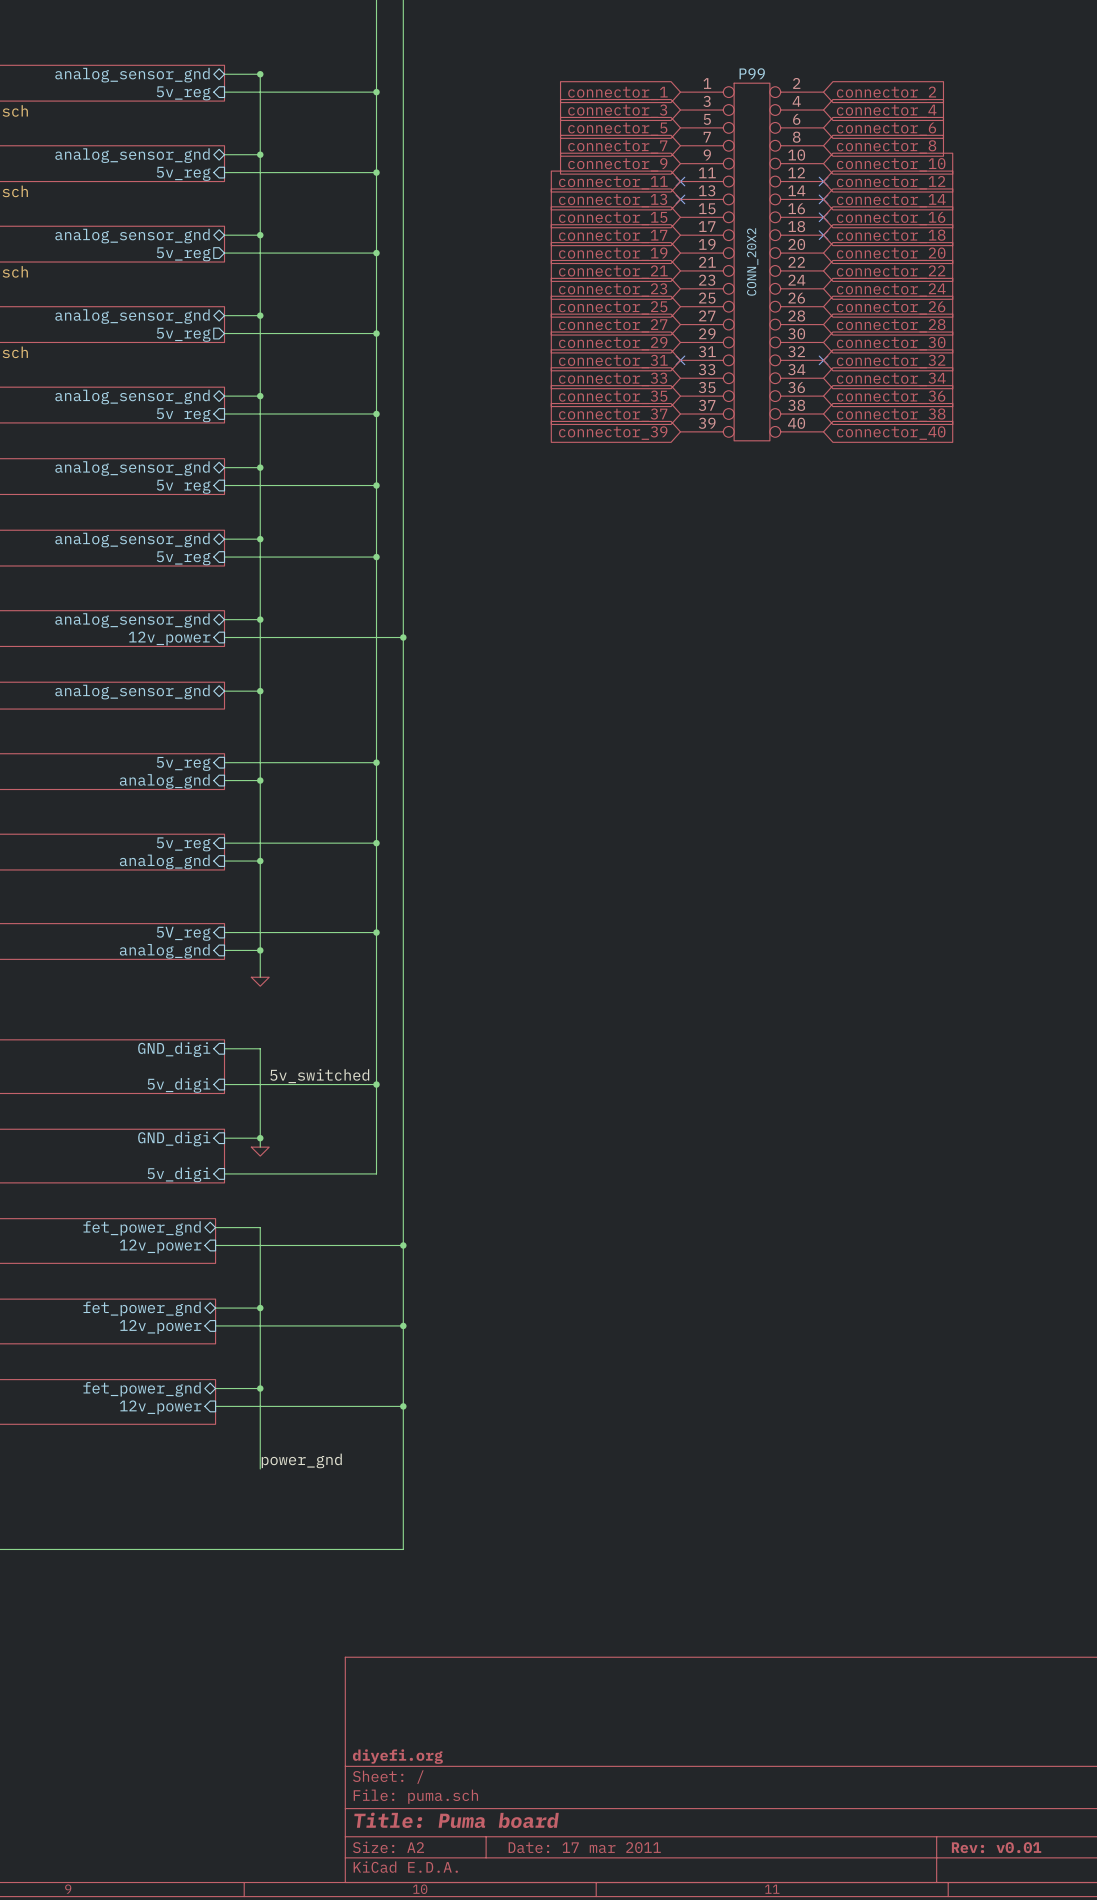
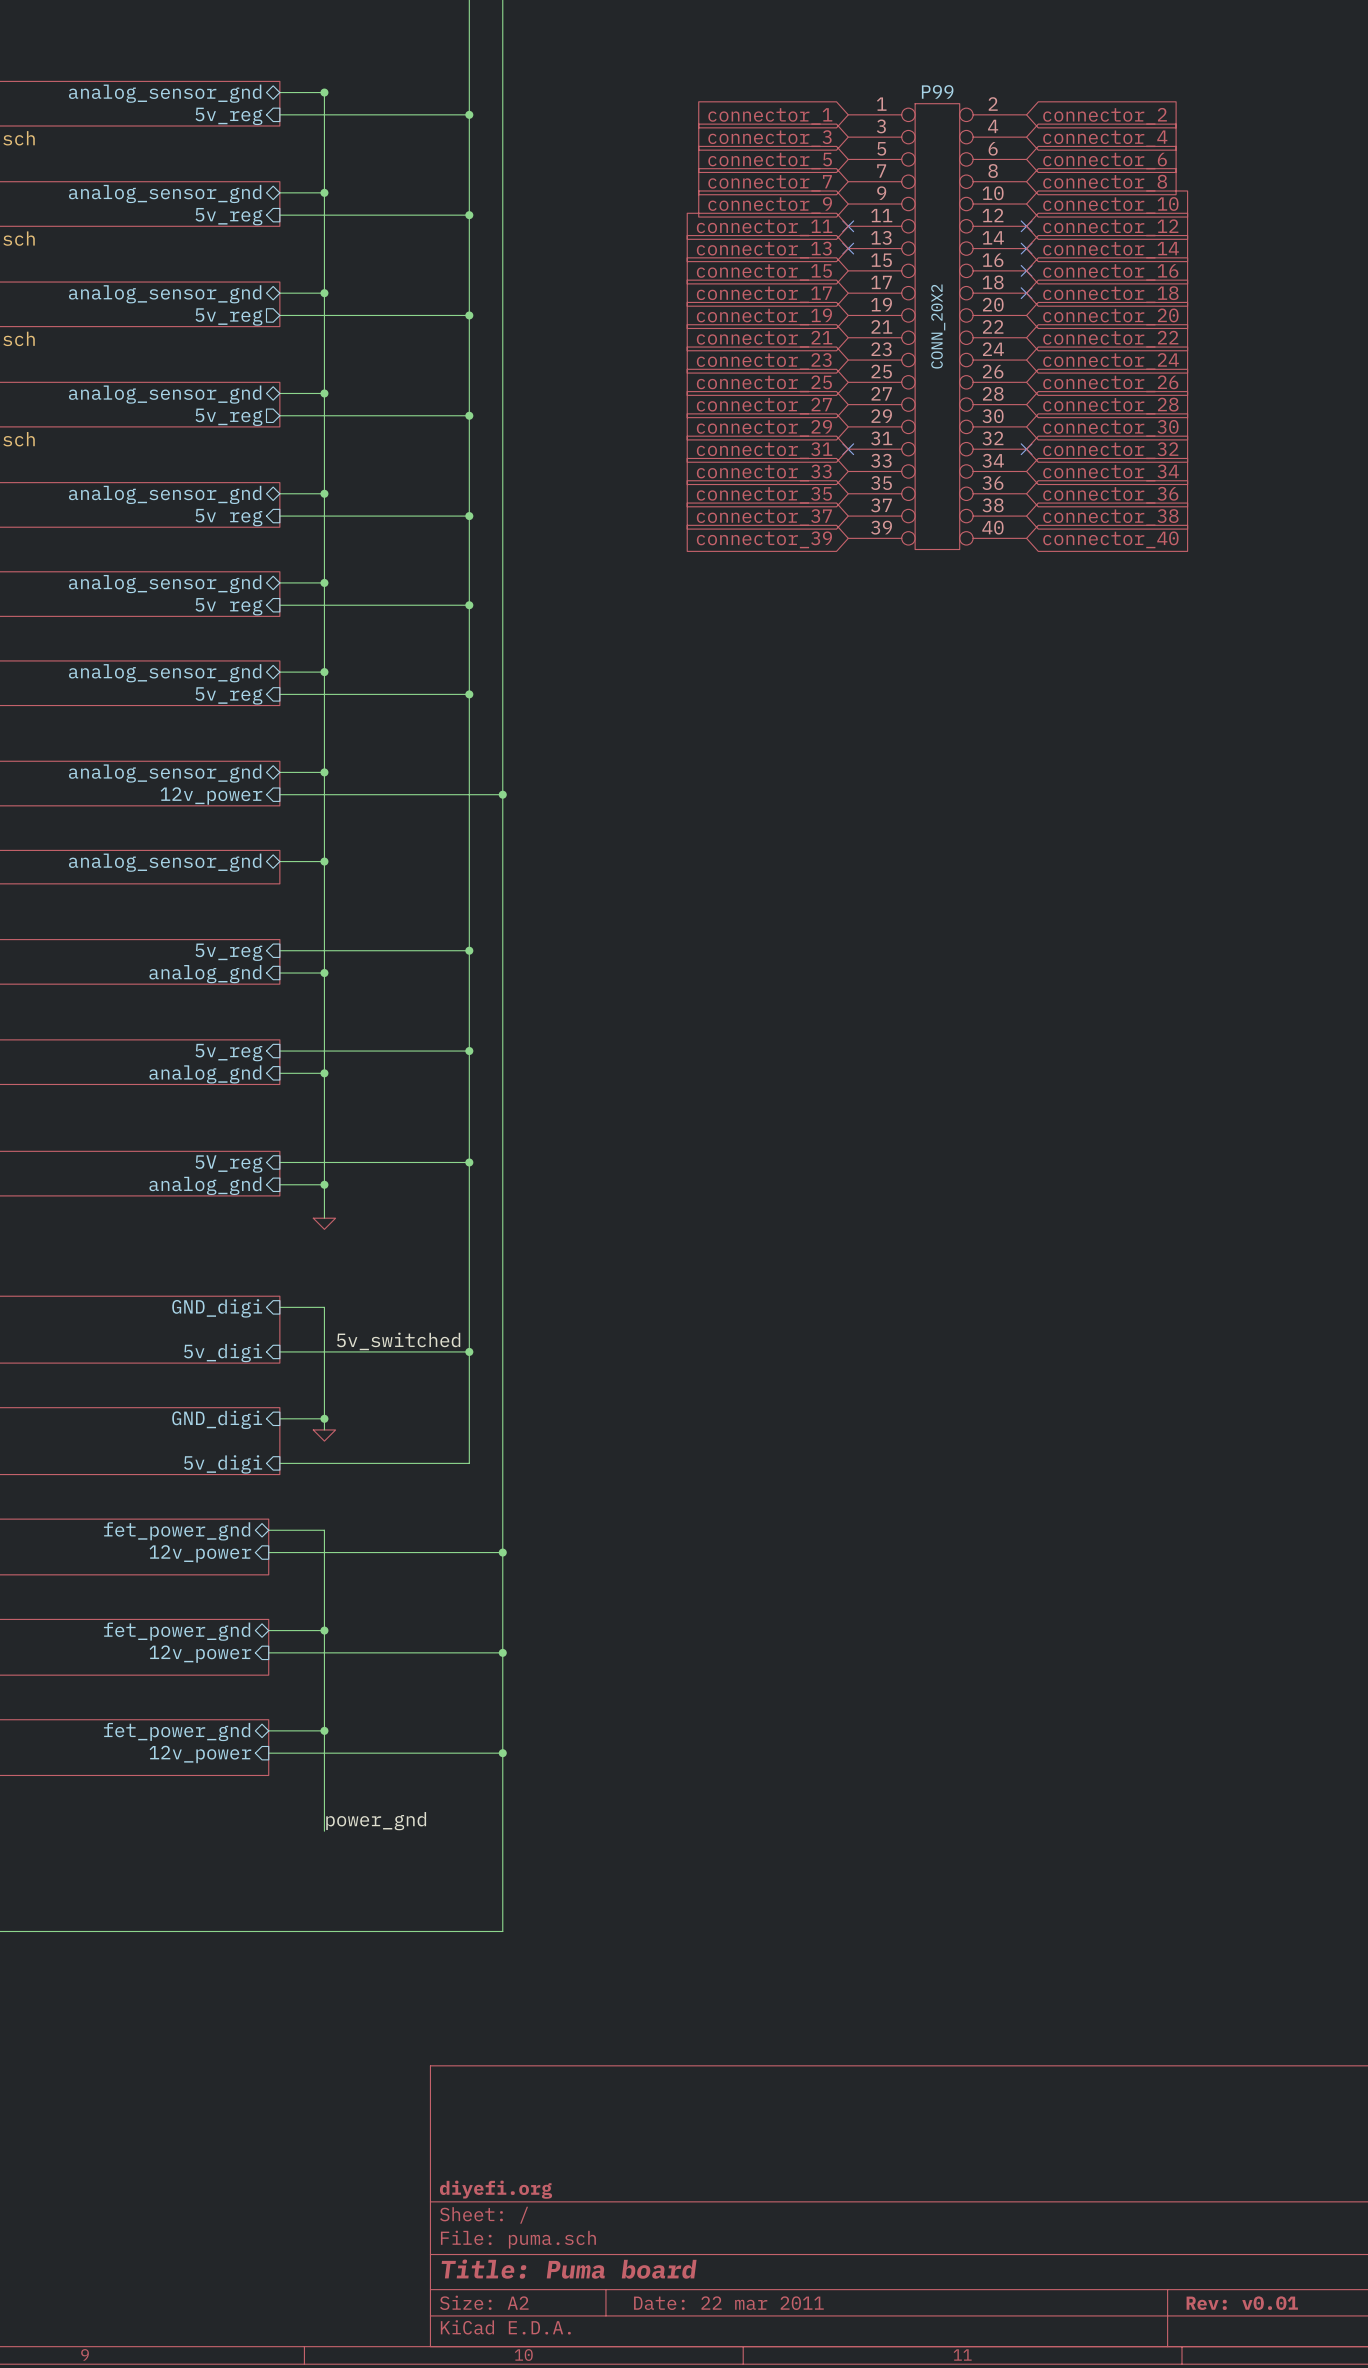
title block: Date: 17 mar 2011 (584, 1847) -> Date: 22 mar 2011 (728, 2303)

